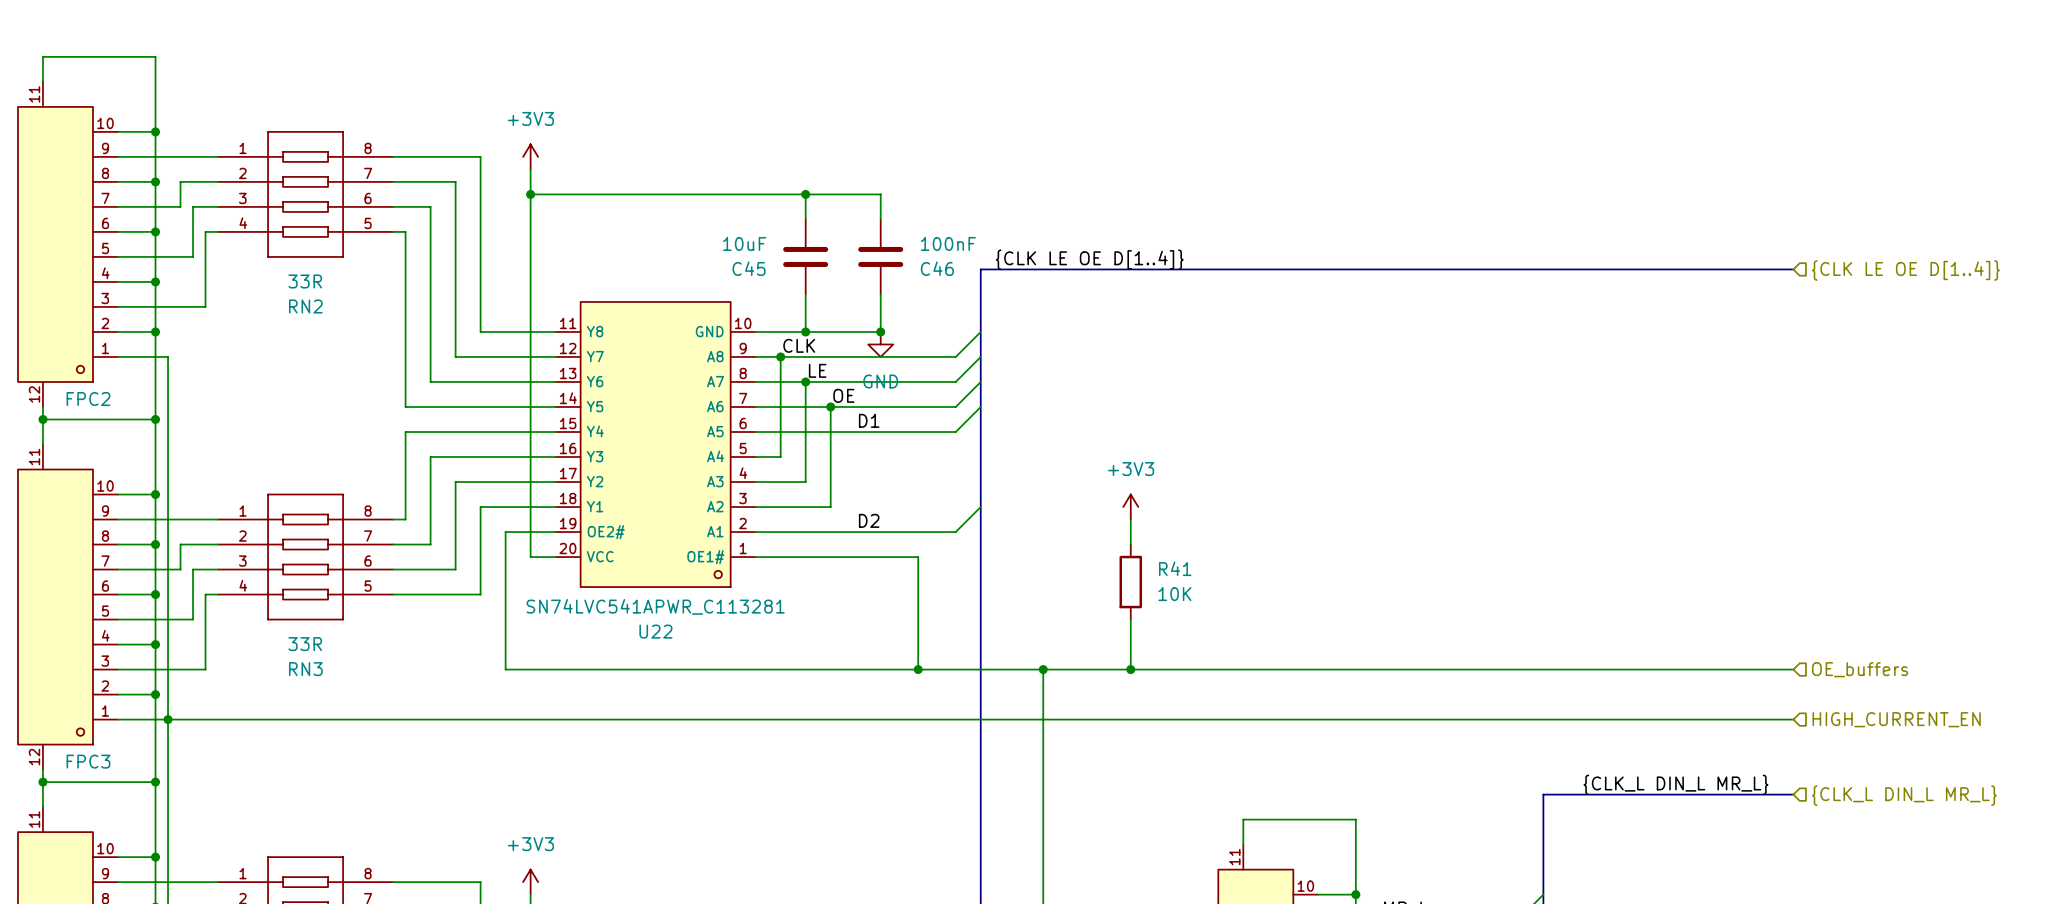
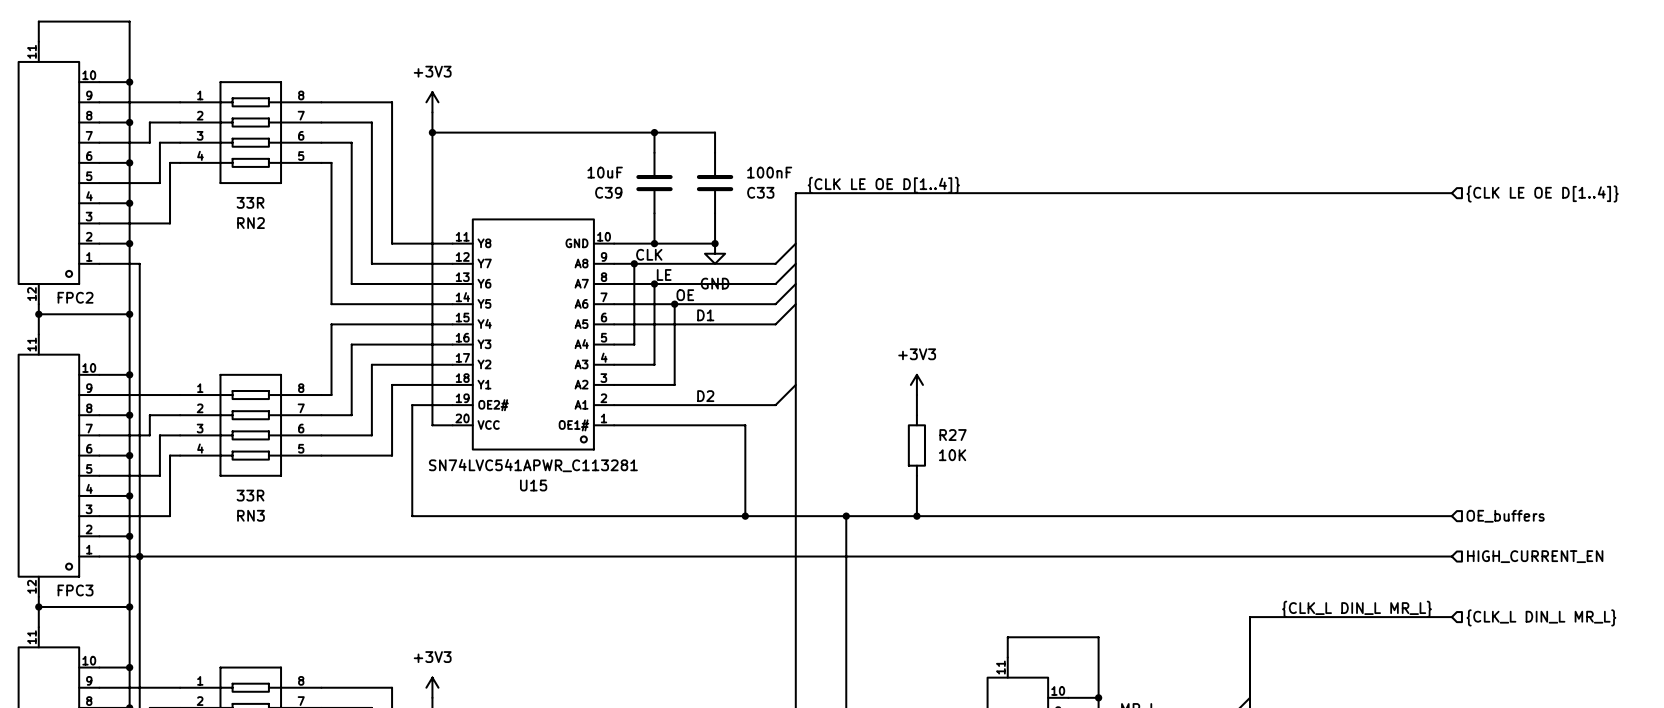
C45 name: C45 (749, 268) -> C39 (608, 192)
C46 name: C46 (937, 268) -> C33 (760, 192)
R41 name: R41 (1175, 568) -> R27 (953, 435)
U22 name: U22 (655, 631) -> U15 (533, 485)

